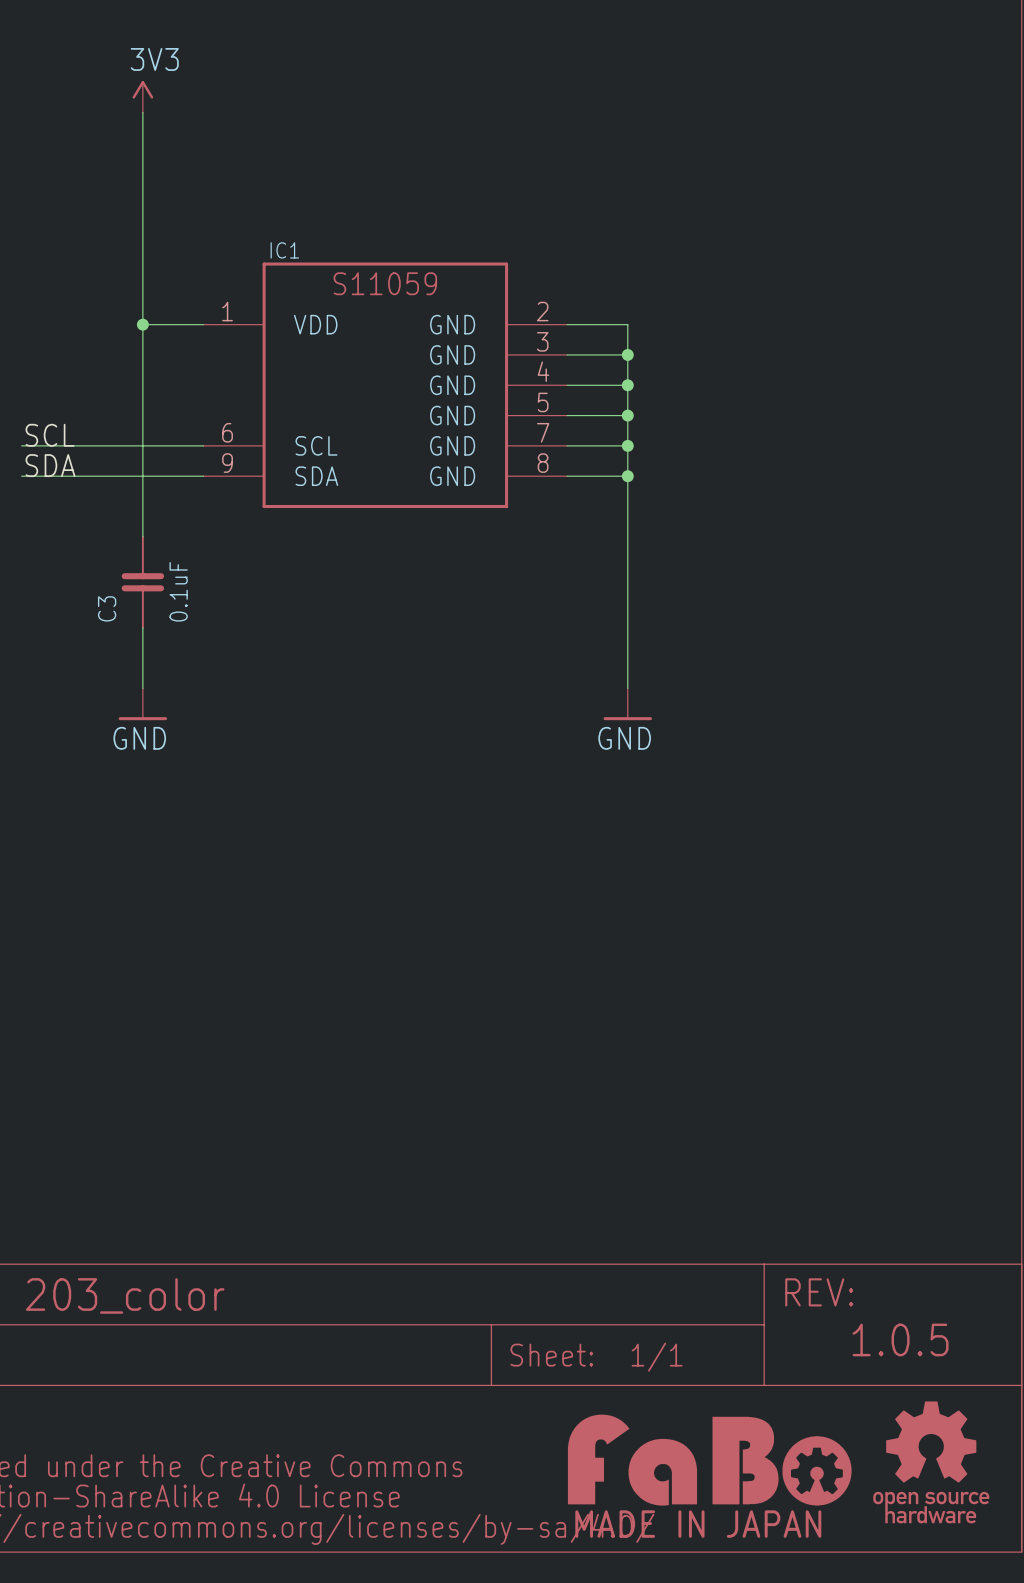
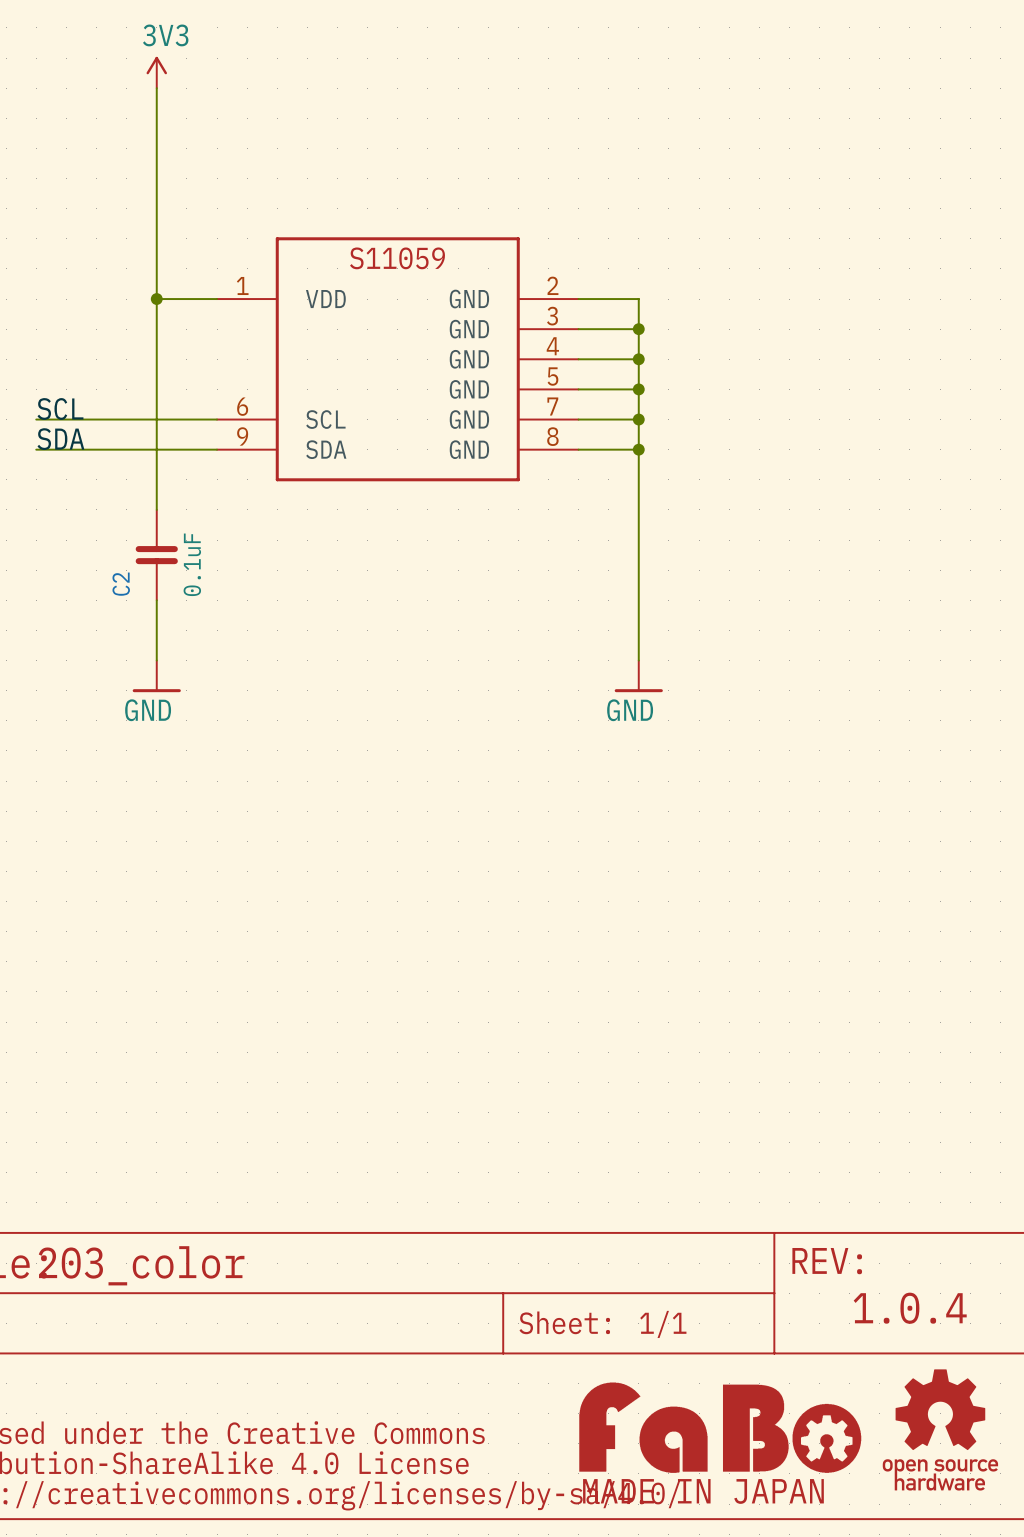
IC1 name: IC1 (284, 250) -> none
C3 name: C3 (107, 608) -> C2 (121, 584)
text: 1.0.5 (900, 1339) -> 1.0.4 (910, 1308)

